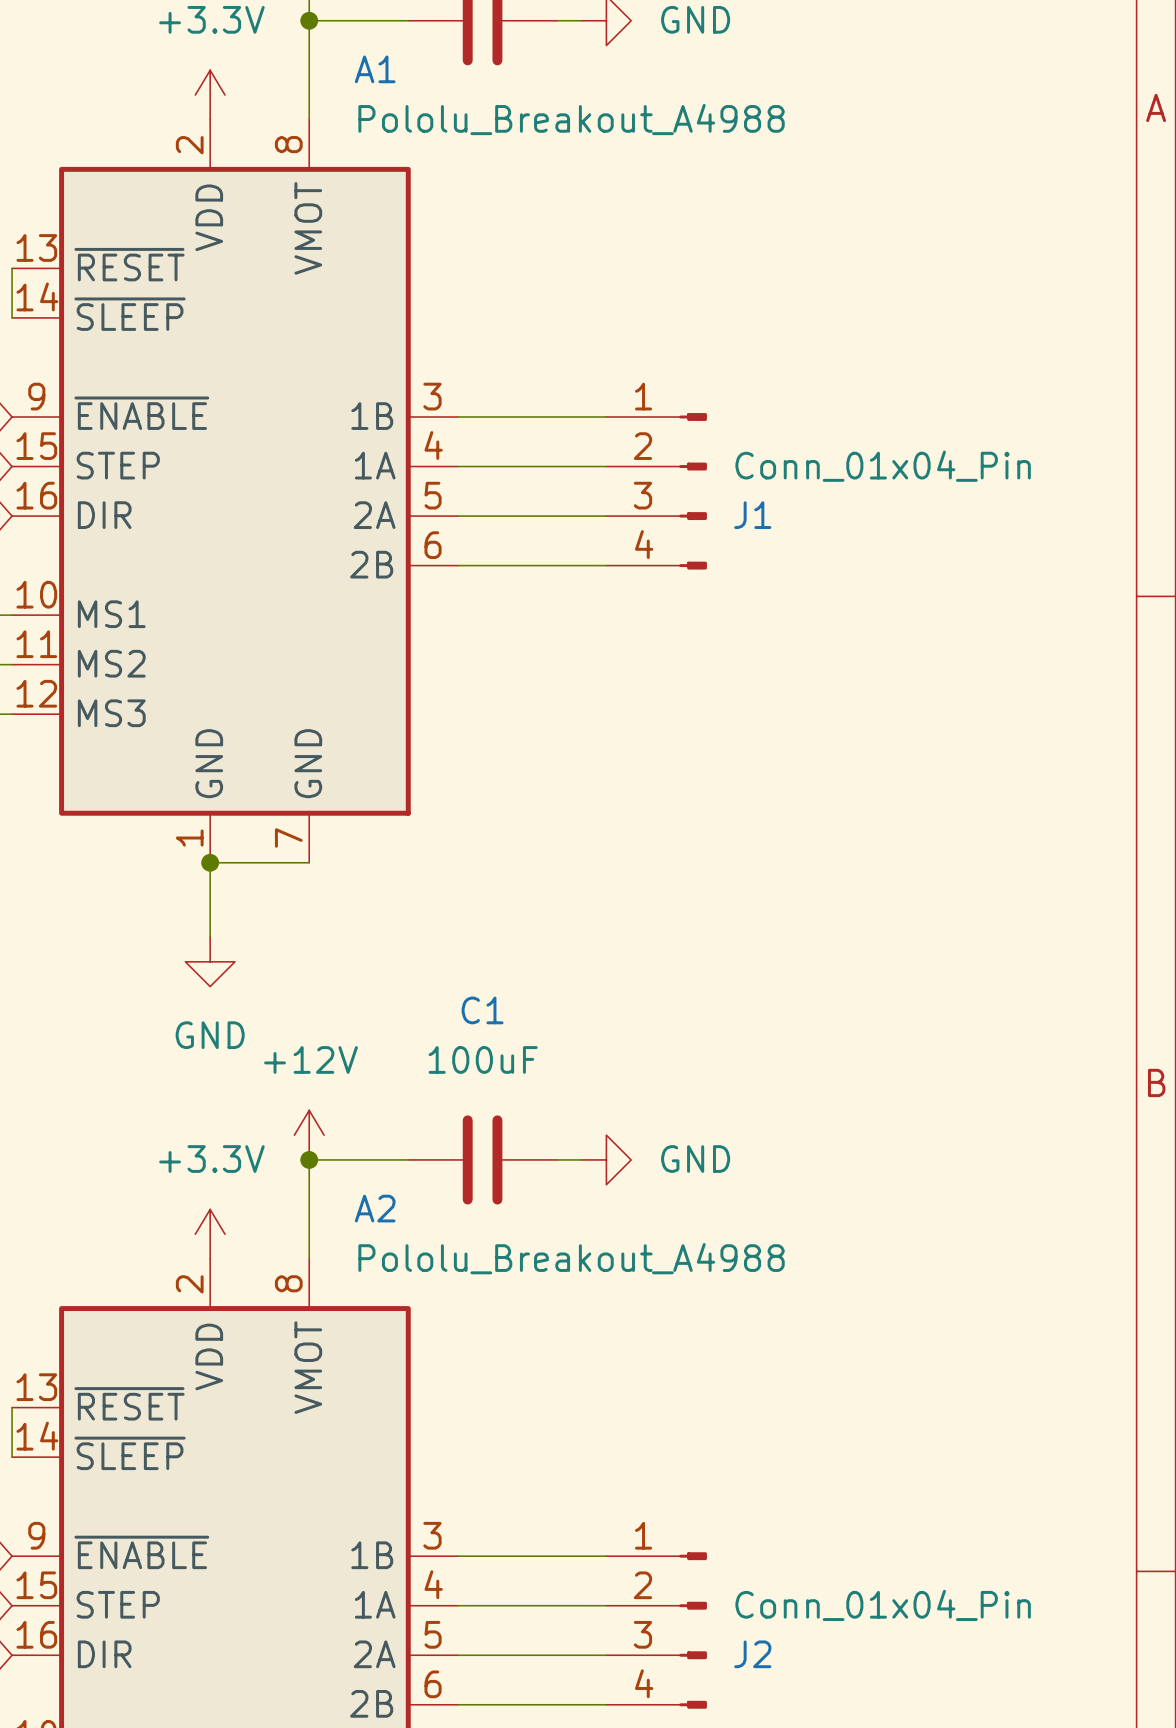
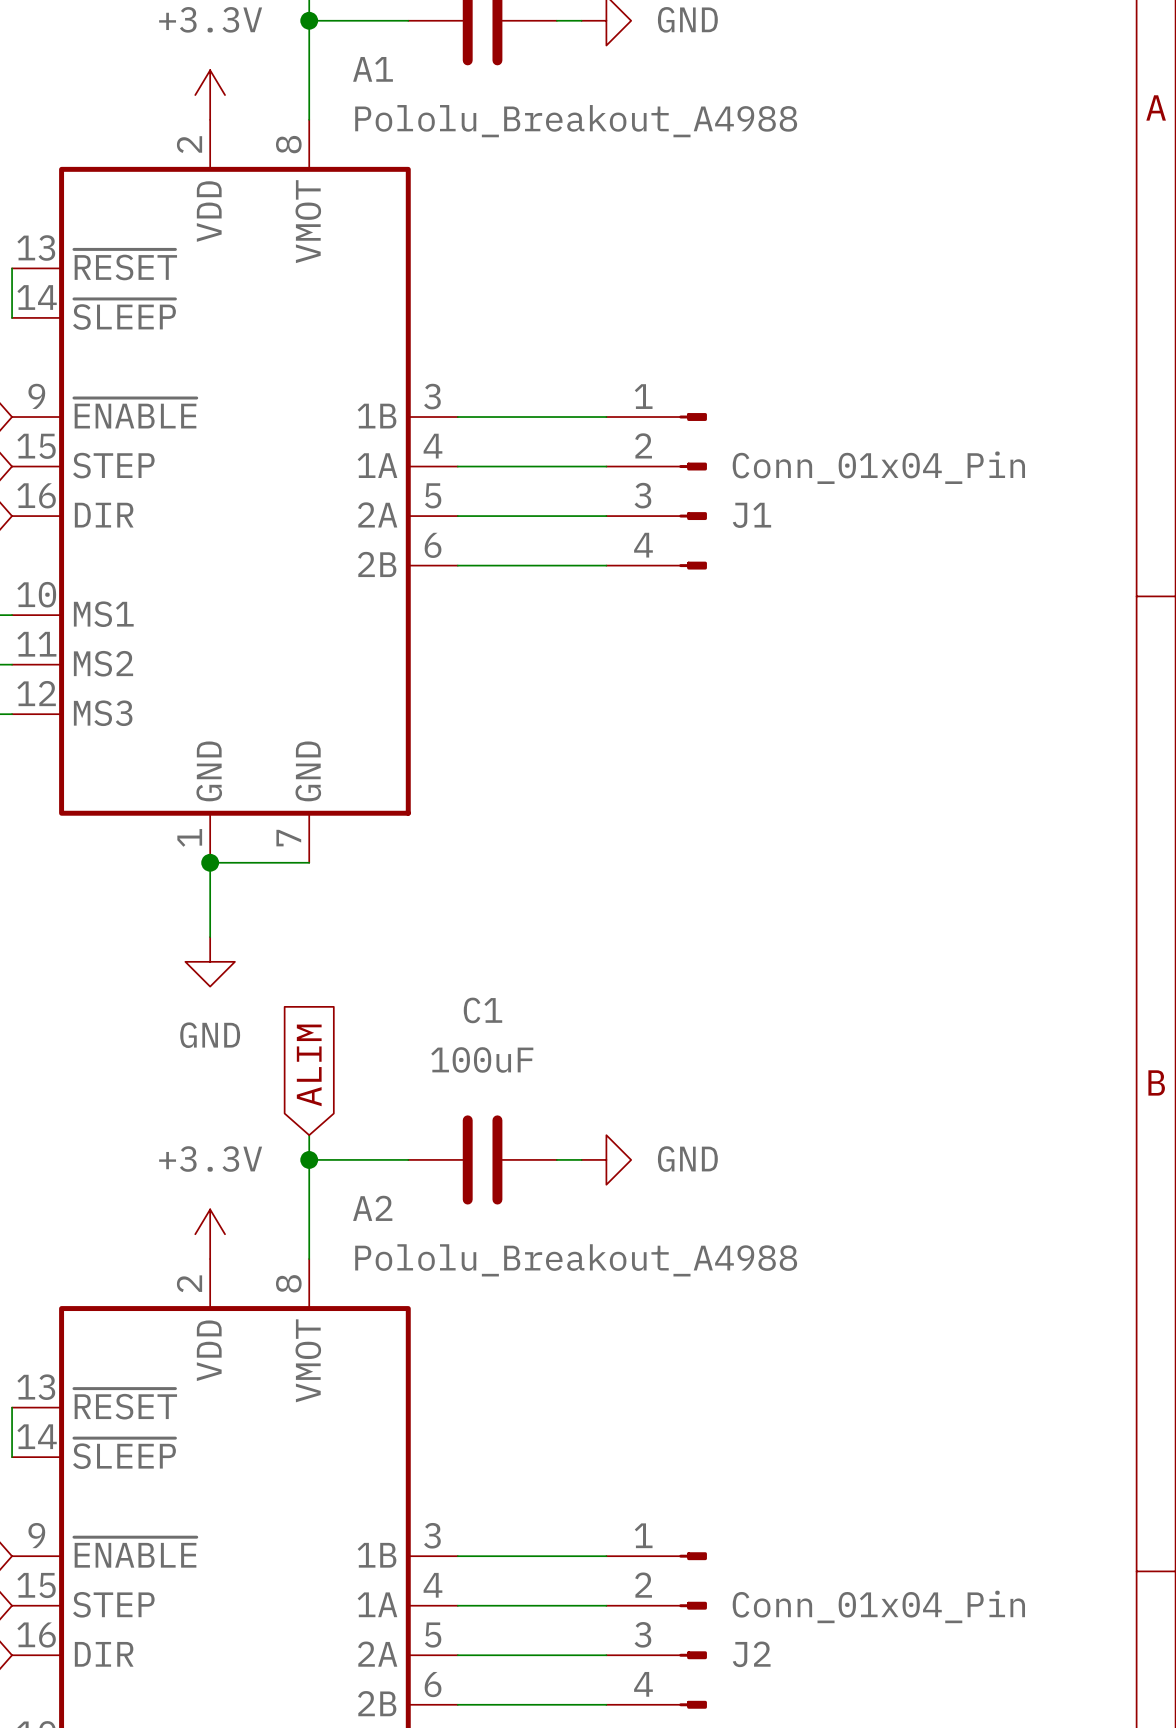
global label: none -> ALIM (309, 1065)
power symbol: +12V (309, 1135) -> none

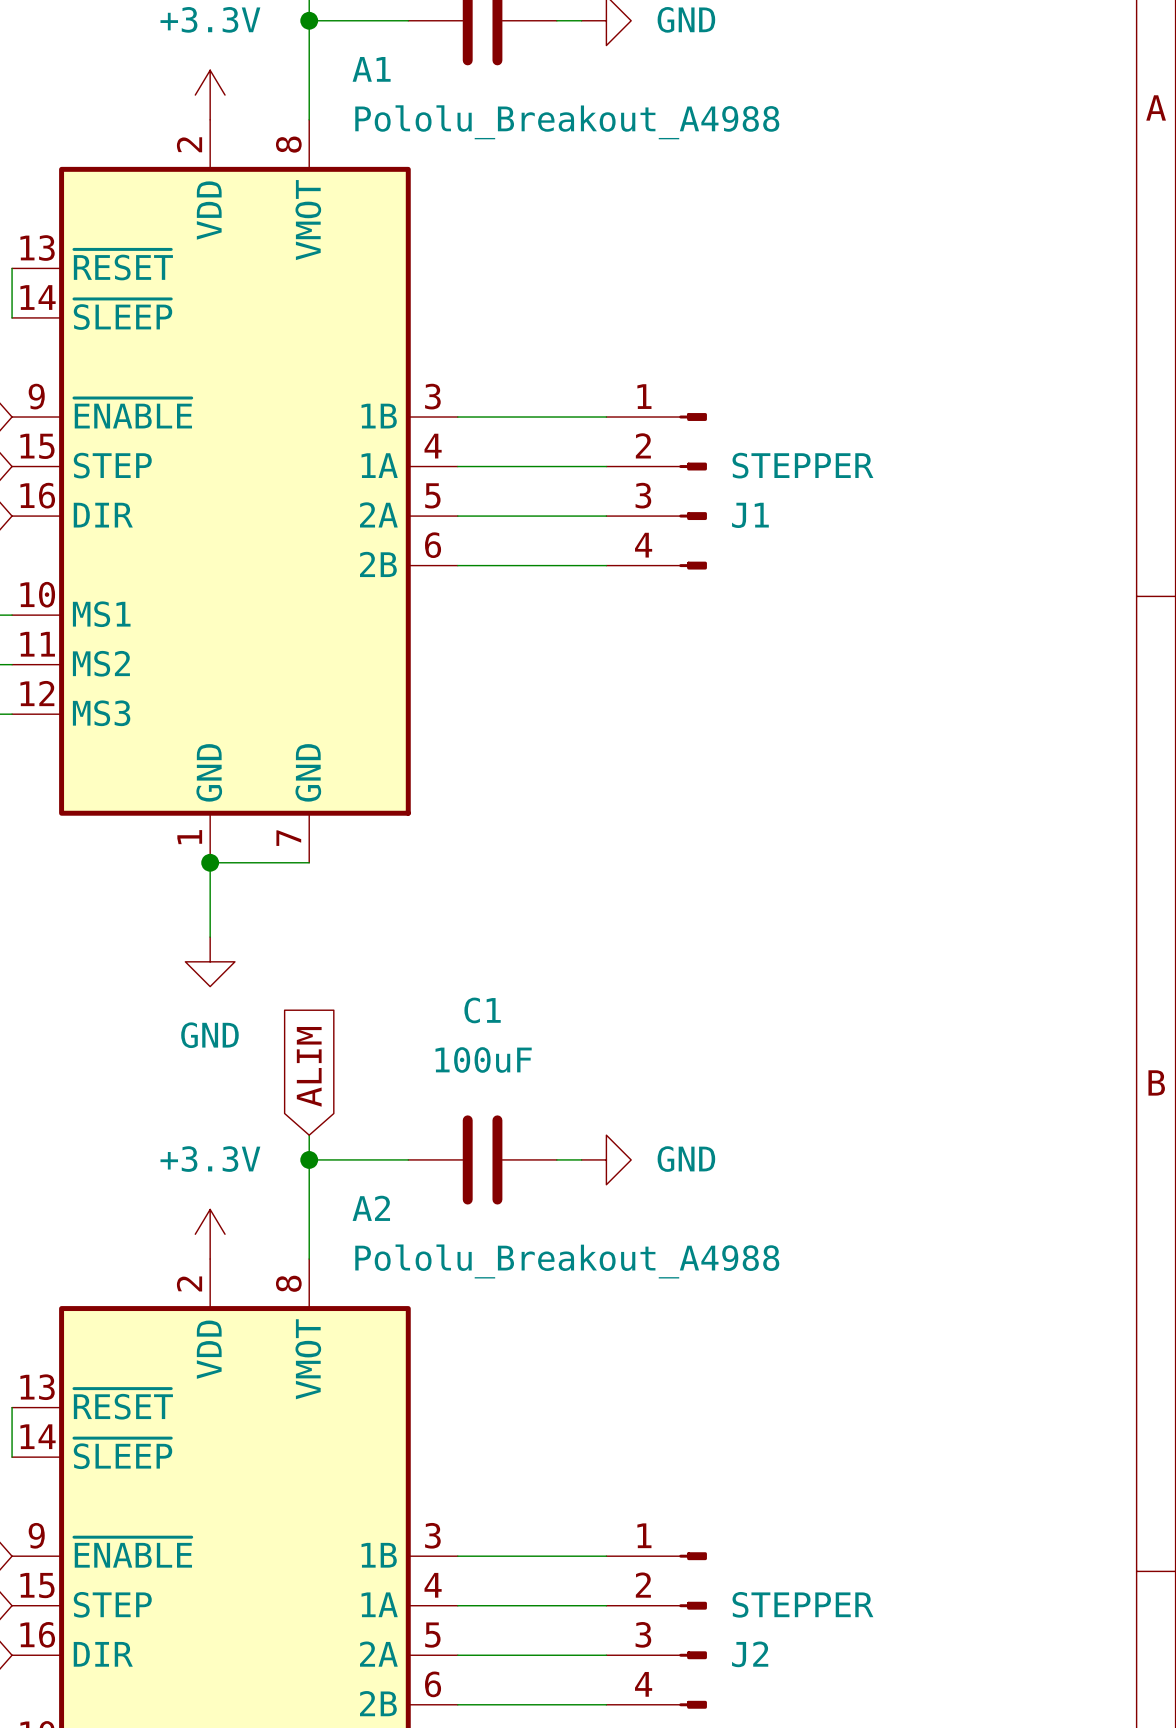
J1 value: Conn_01x04_Pin (878, 467) -> STEPPER (802, 465)
J2 value: Conn_01x04_Pin (878, 1606) -> STEPPER (802, 1604)

